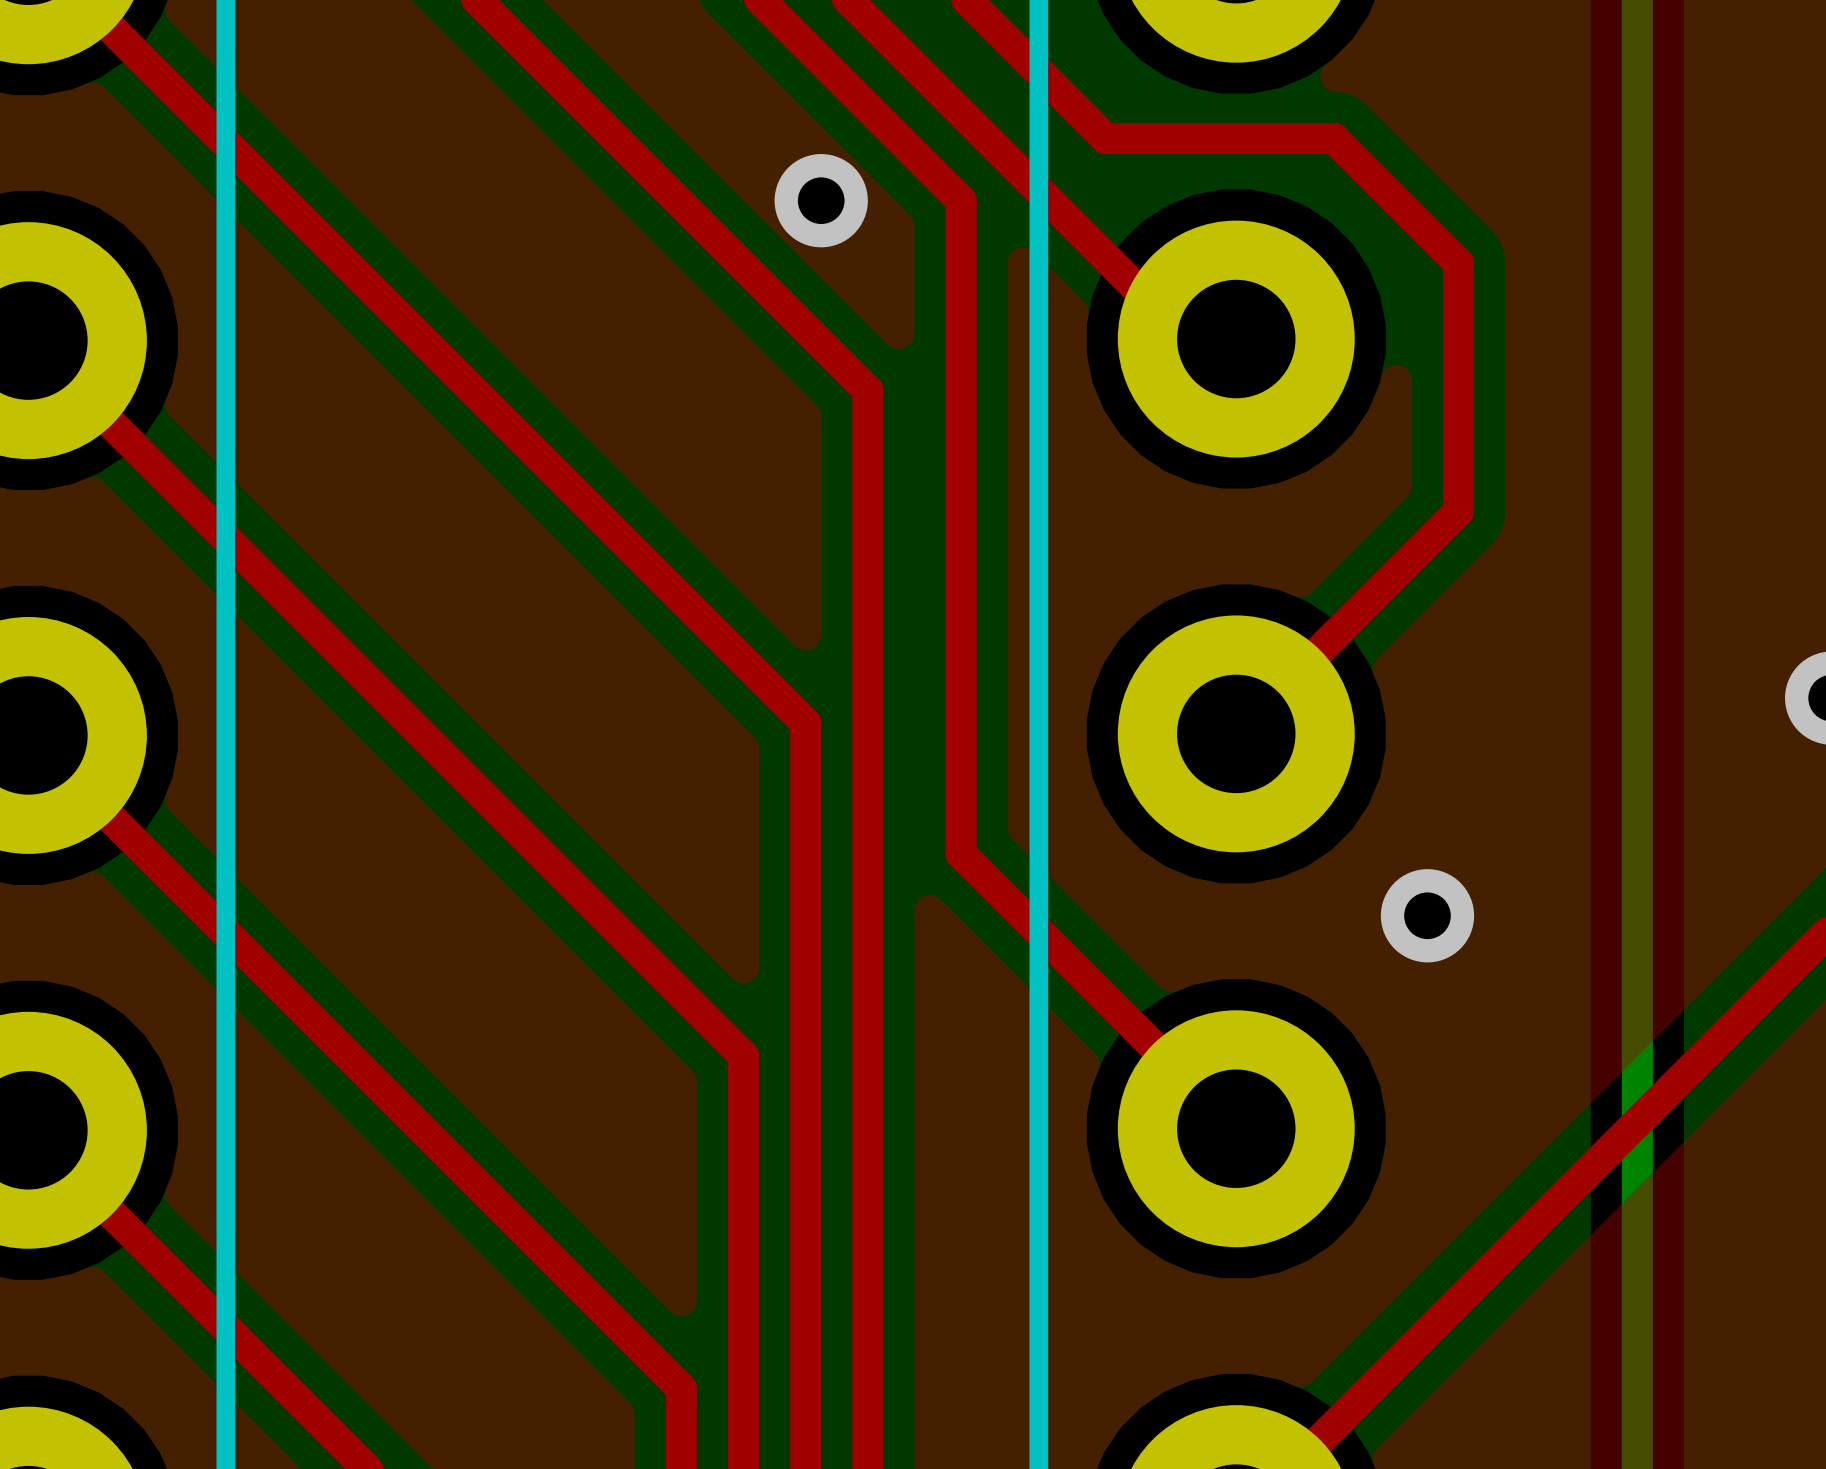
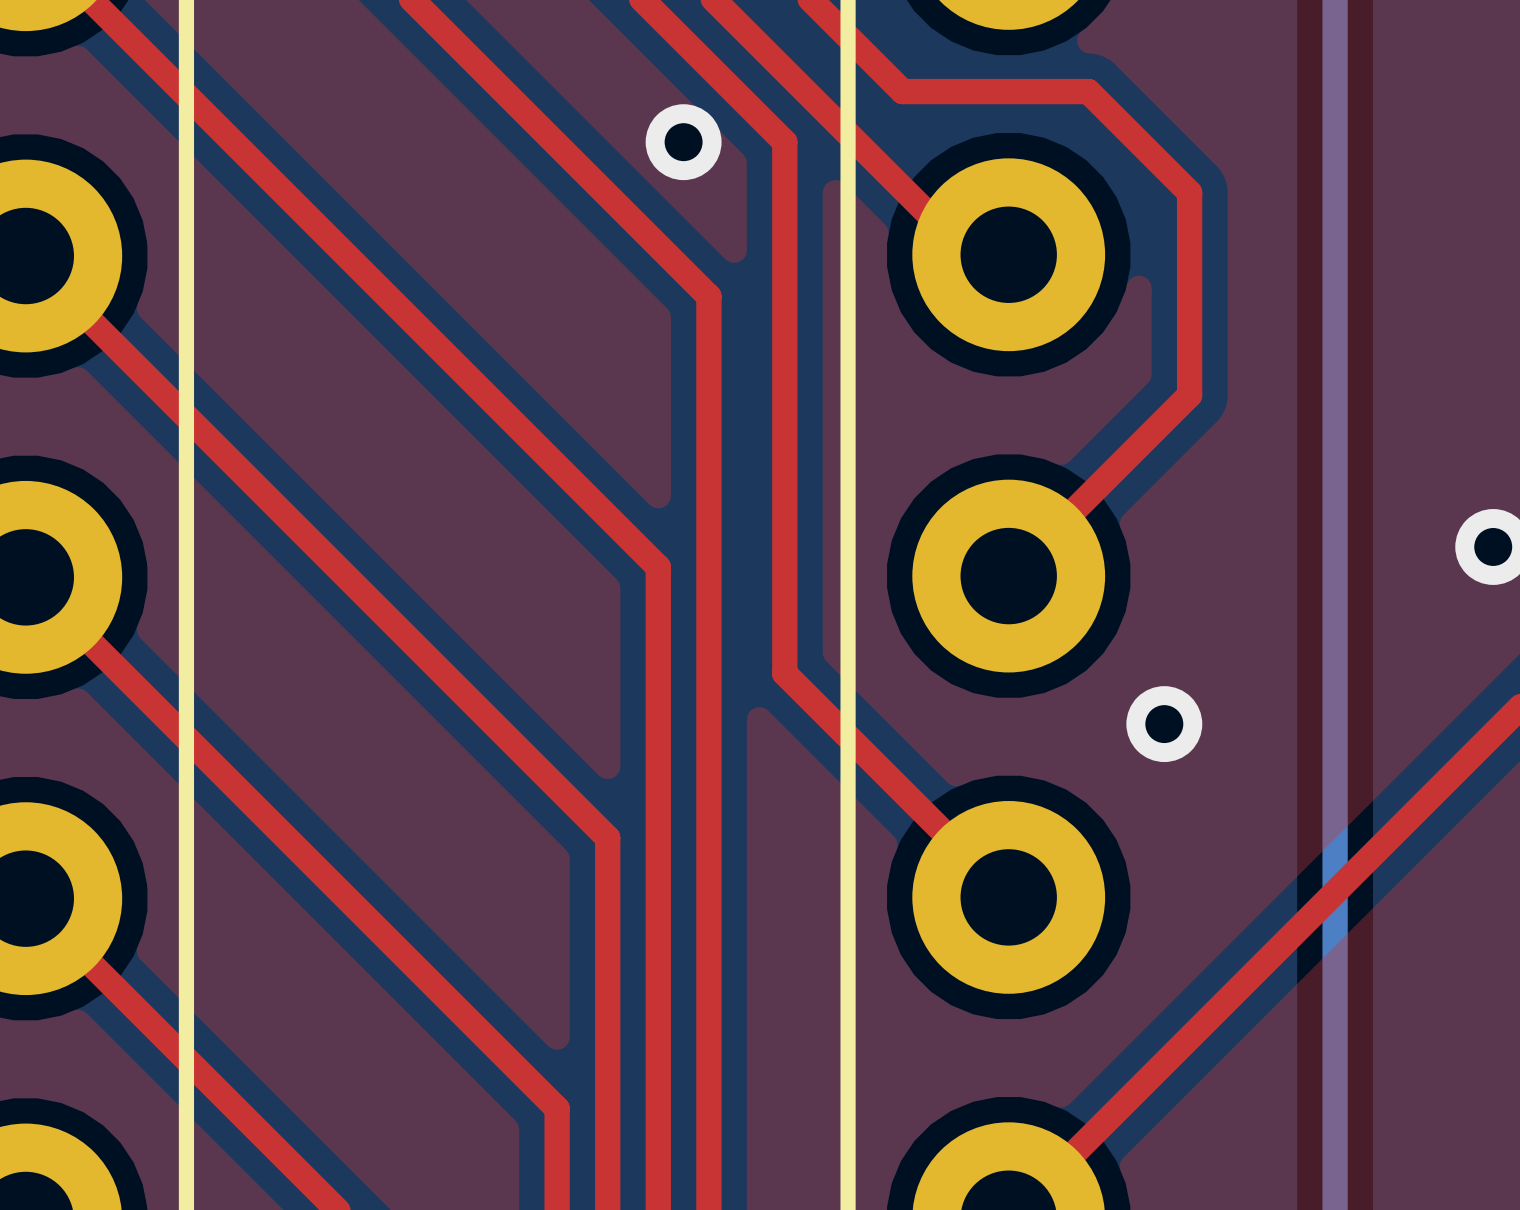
via position: (821, 200) -> (683, 142)

